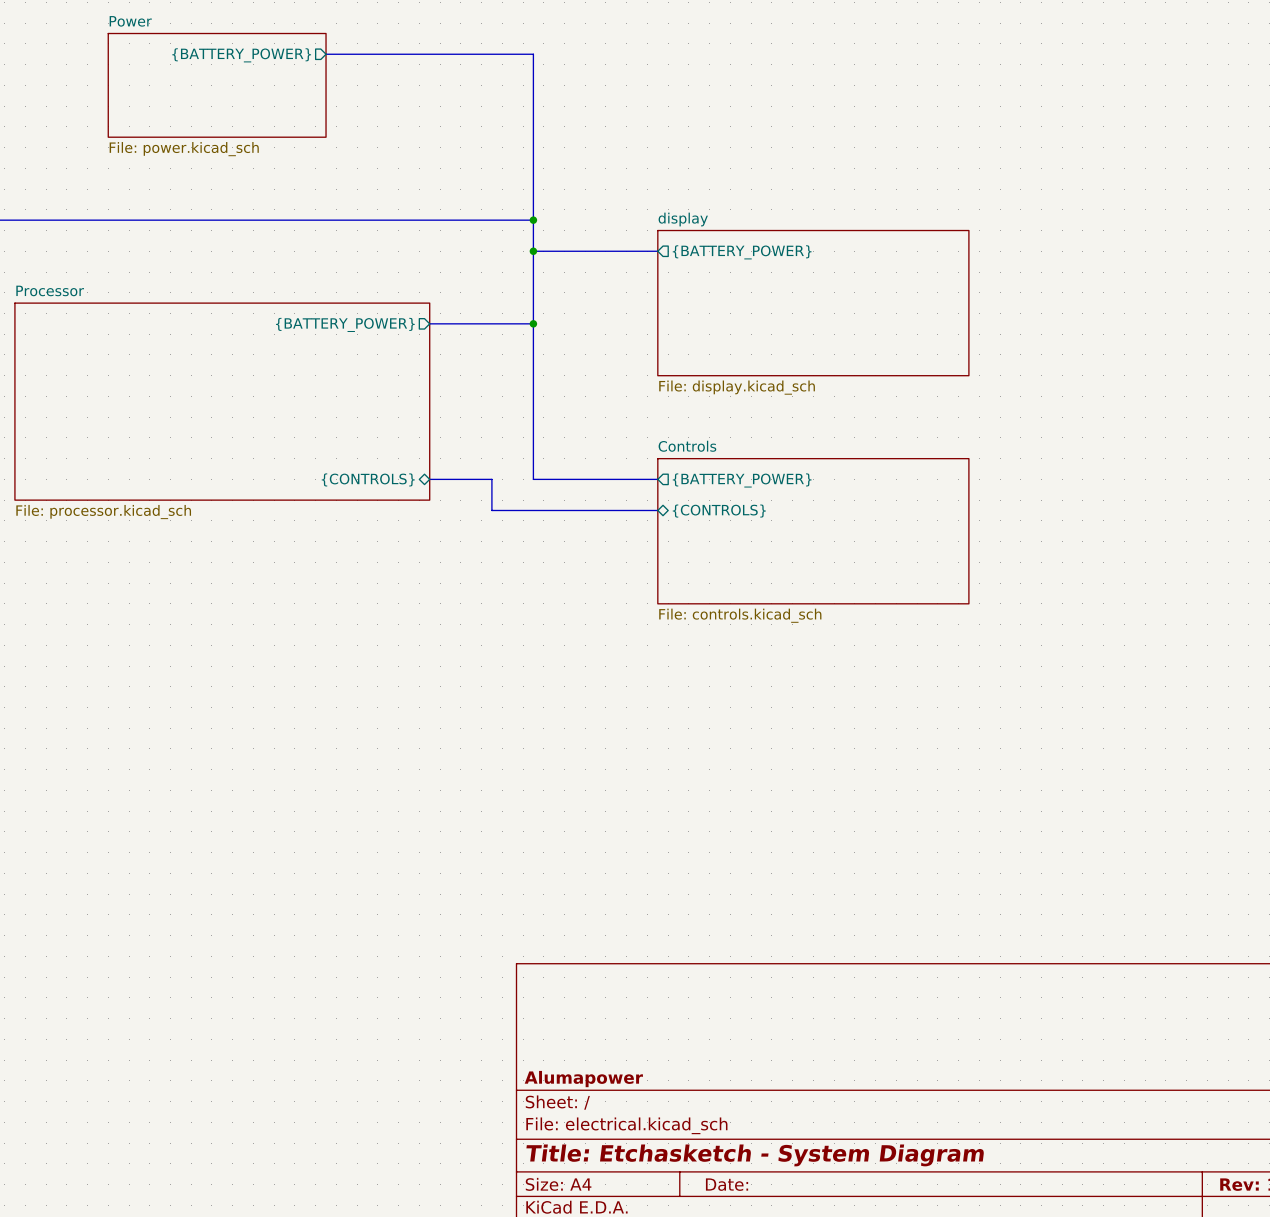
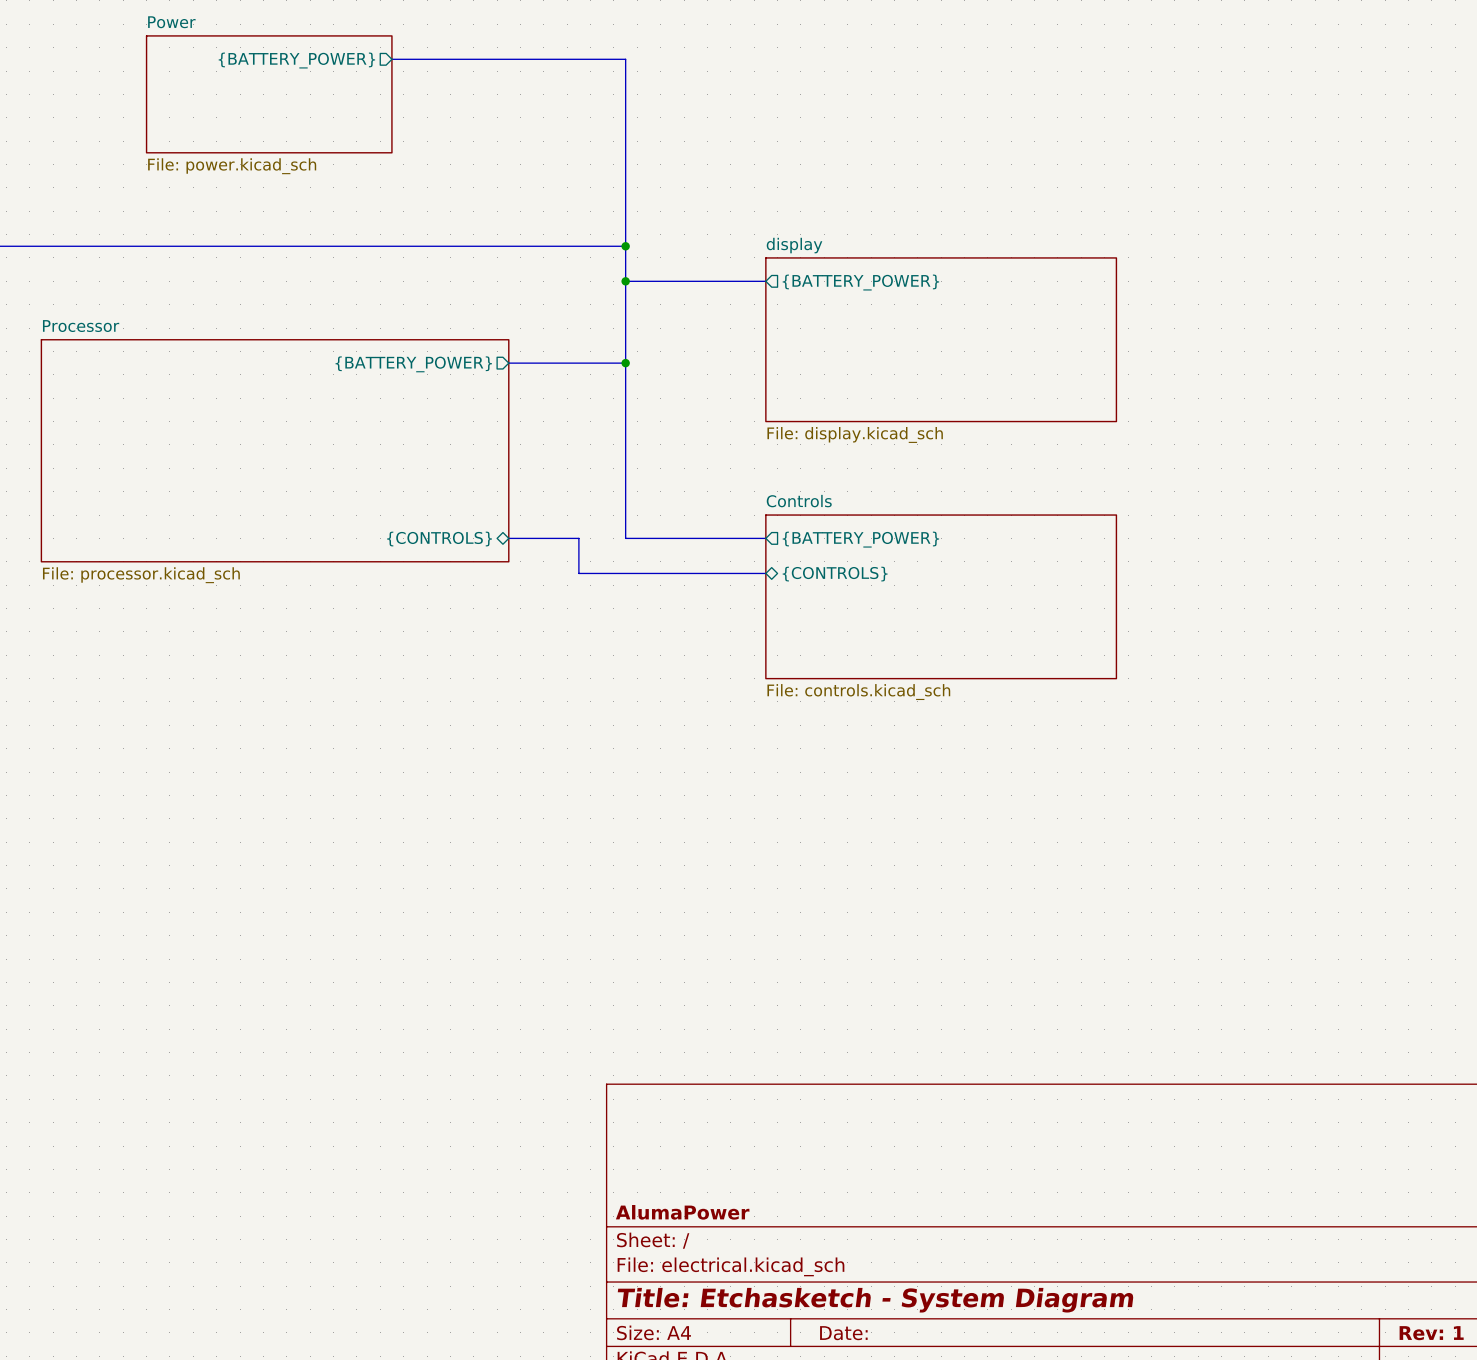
title block: Alumapower (583, 1079) -> AlumaPower (682, 1212)

